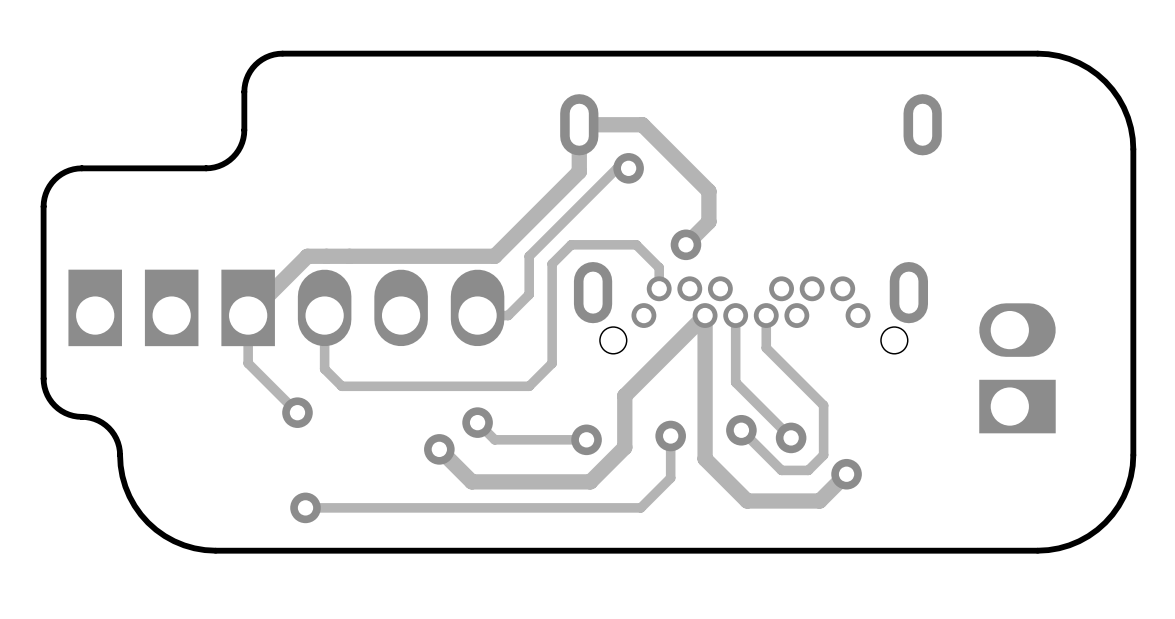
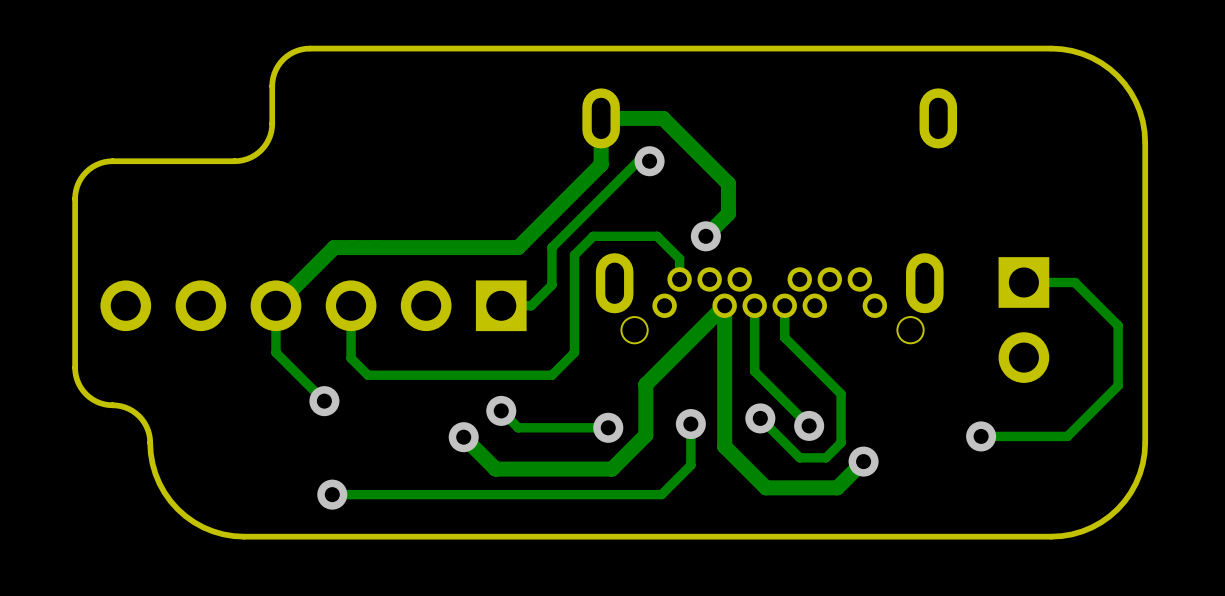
part footprint: [68, 269, 505, 347] -> [100, 280, 527, 332]
track: none -> (1023, 282) (1074, 282) (1118, 325) (1118, 385) (1067, 436) (981, 436)
part: none -> (1023, 320)
part: (1017, 368) -> none
via: none -> (981, 436)

